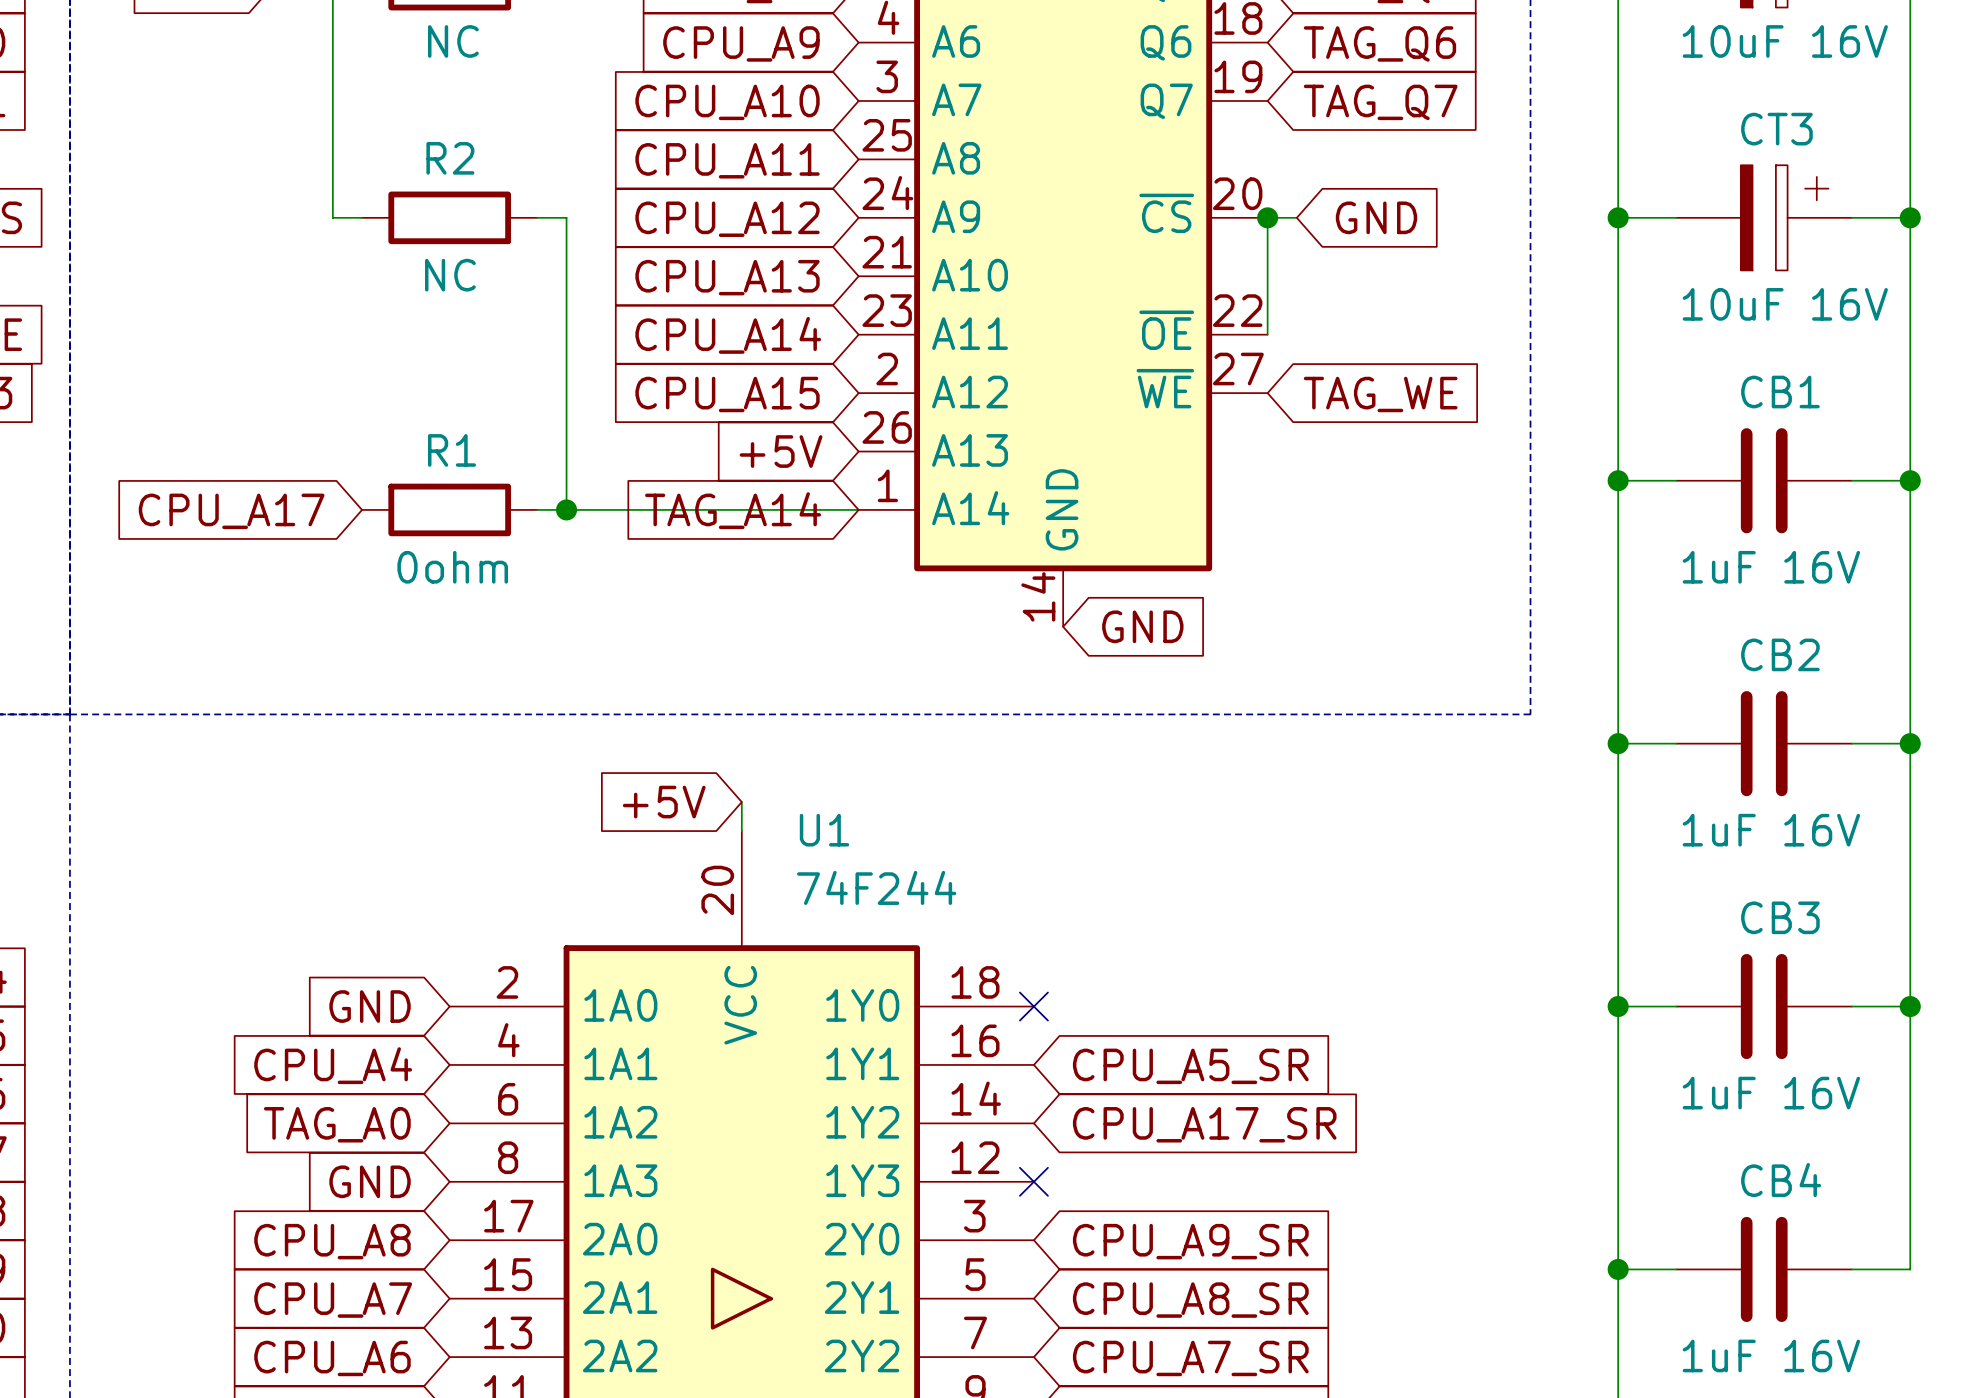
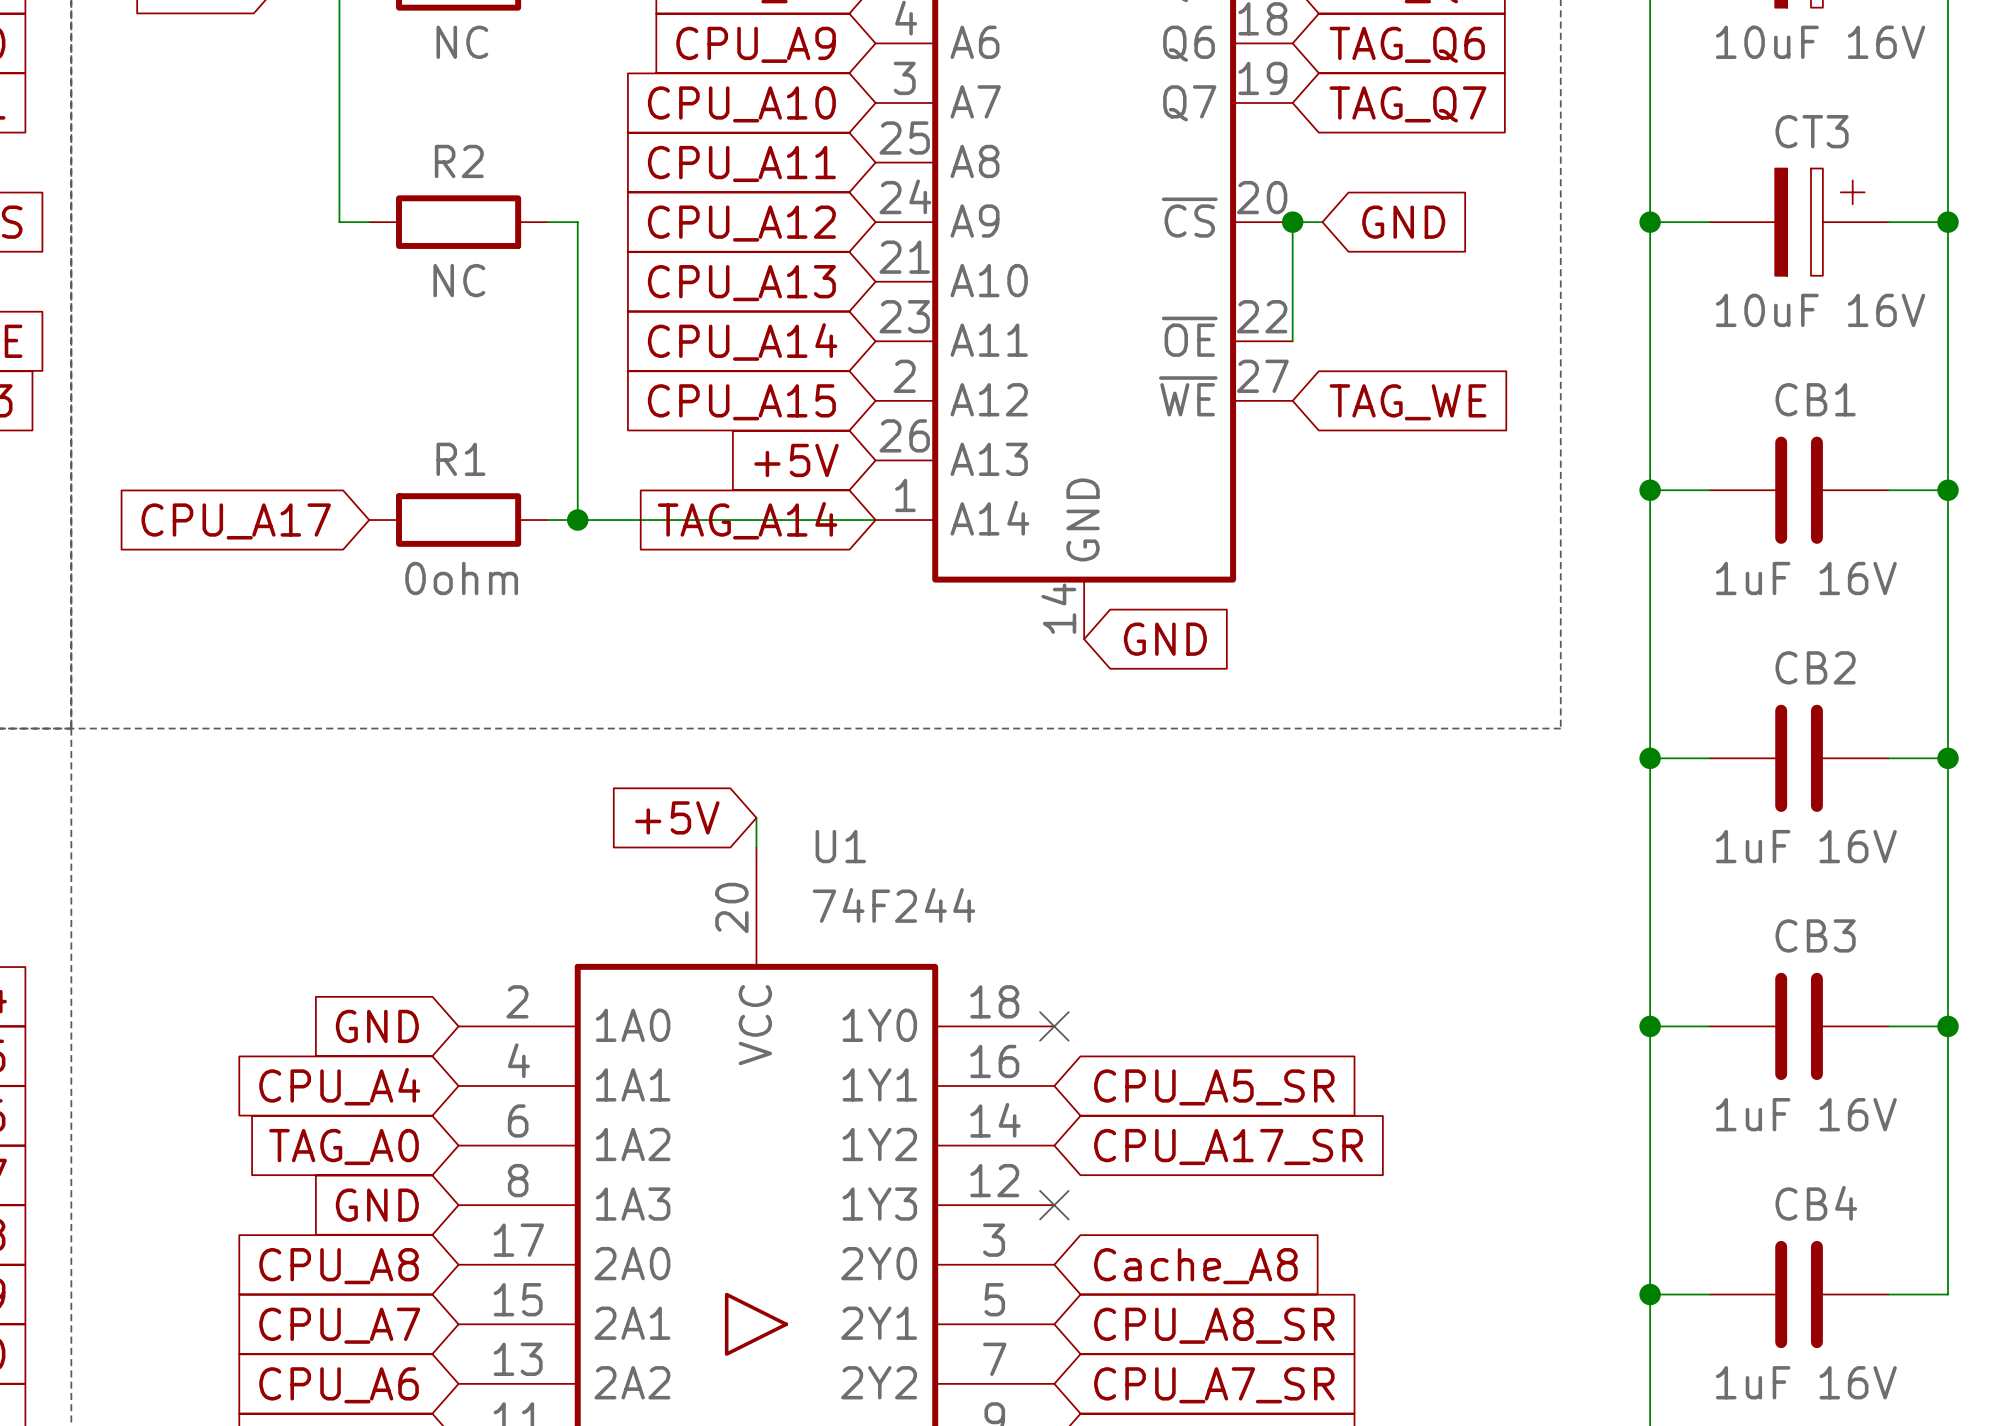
global label: CPU_A9_SR (1190, 1241) -> Cache_A8 (1195, 1266)

